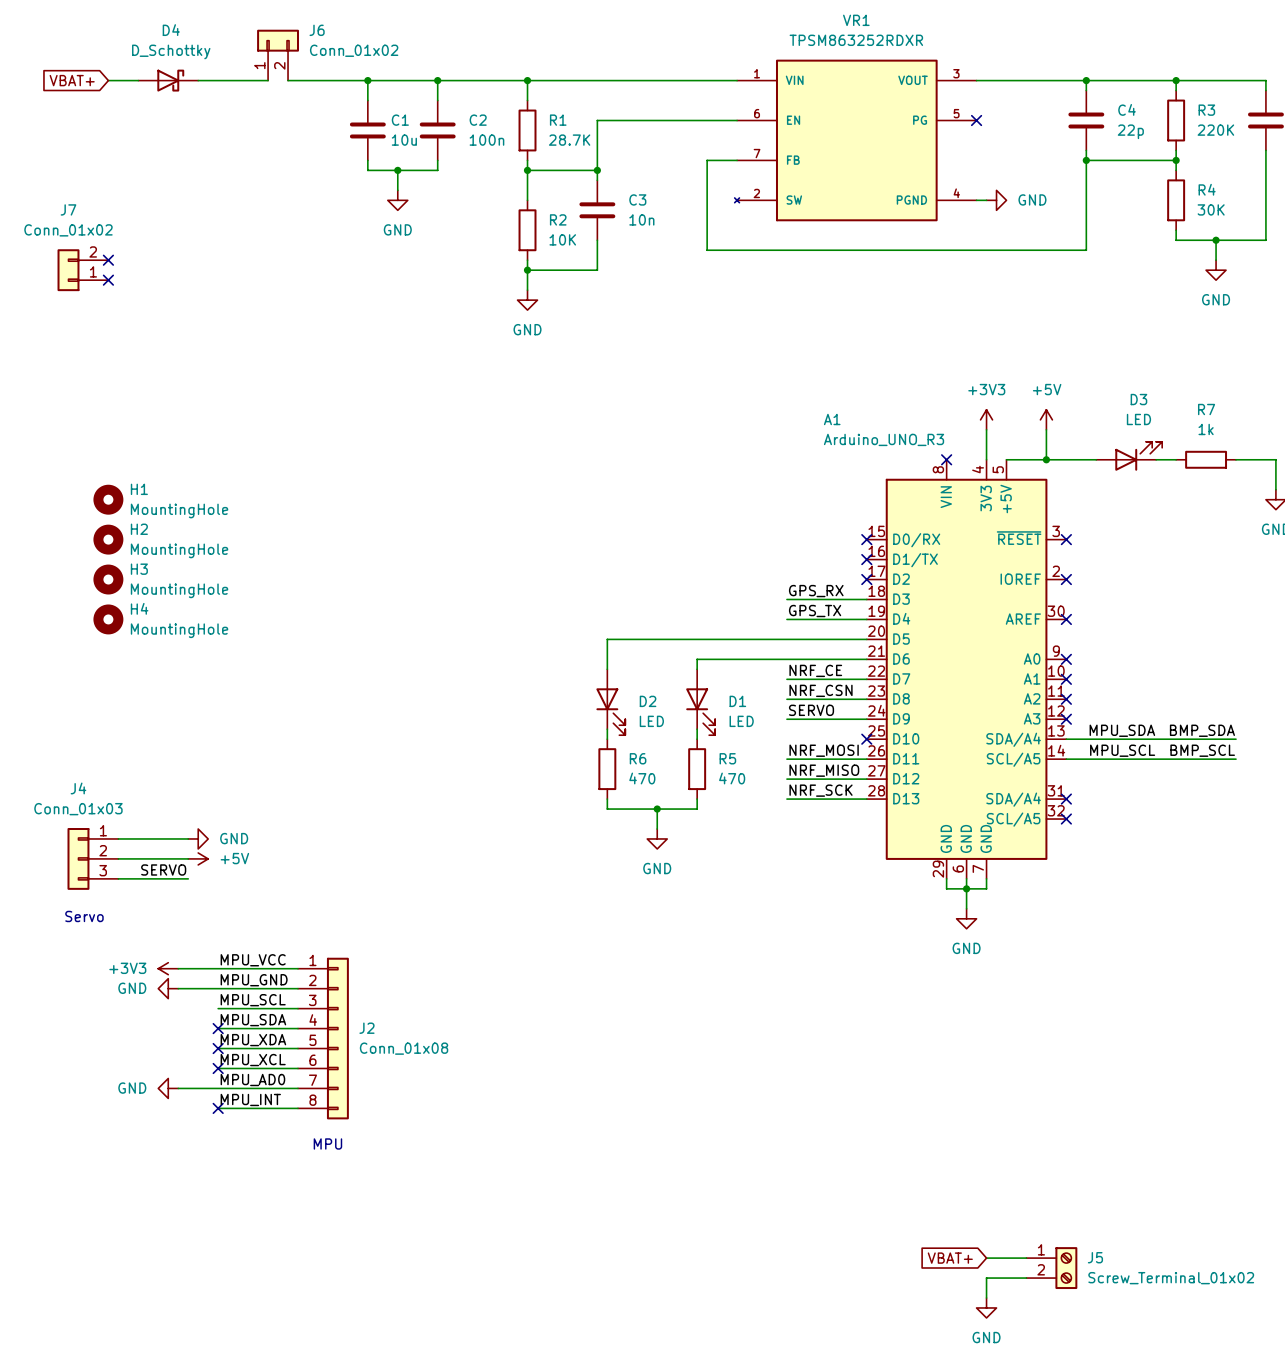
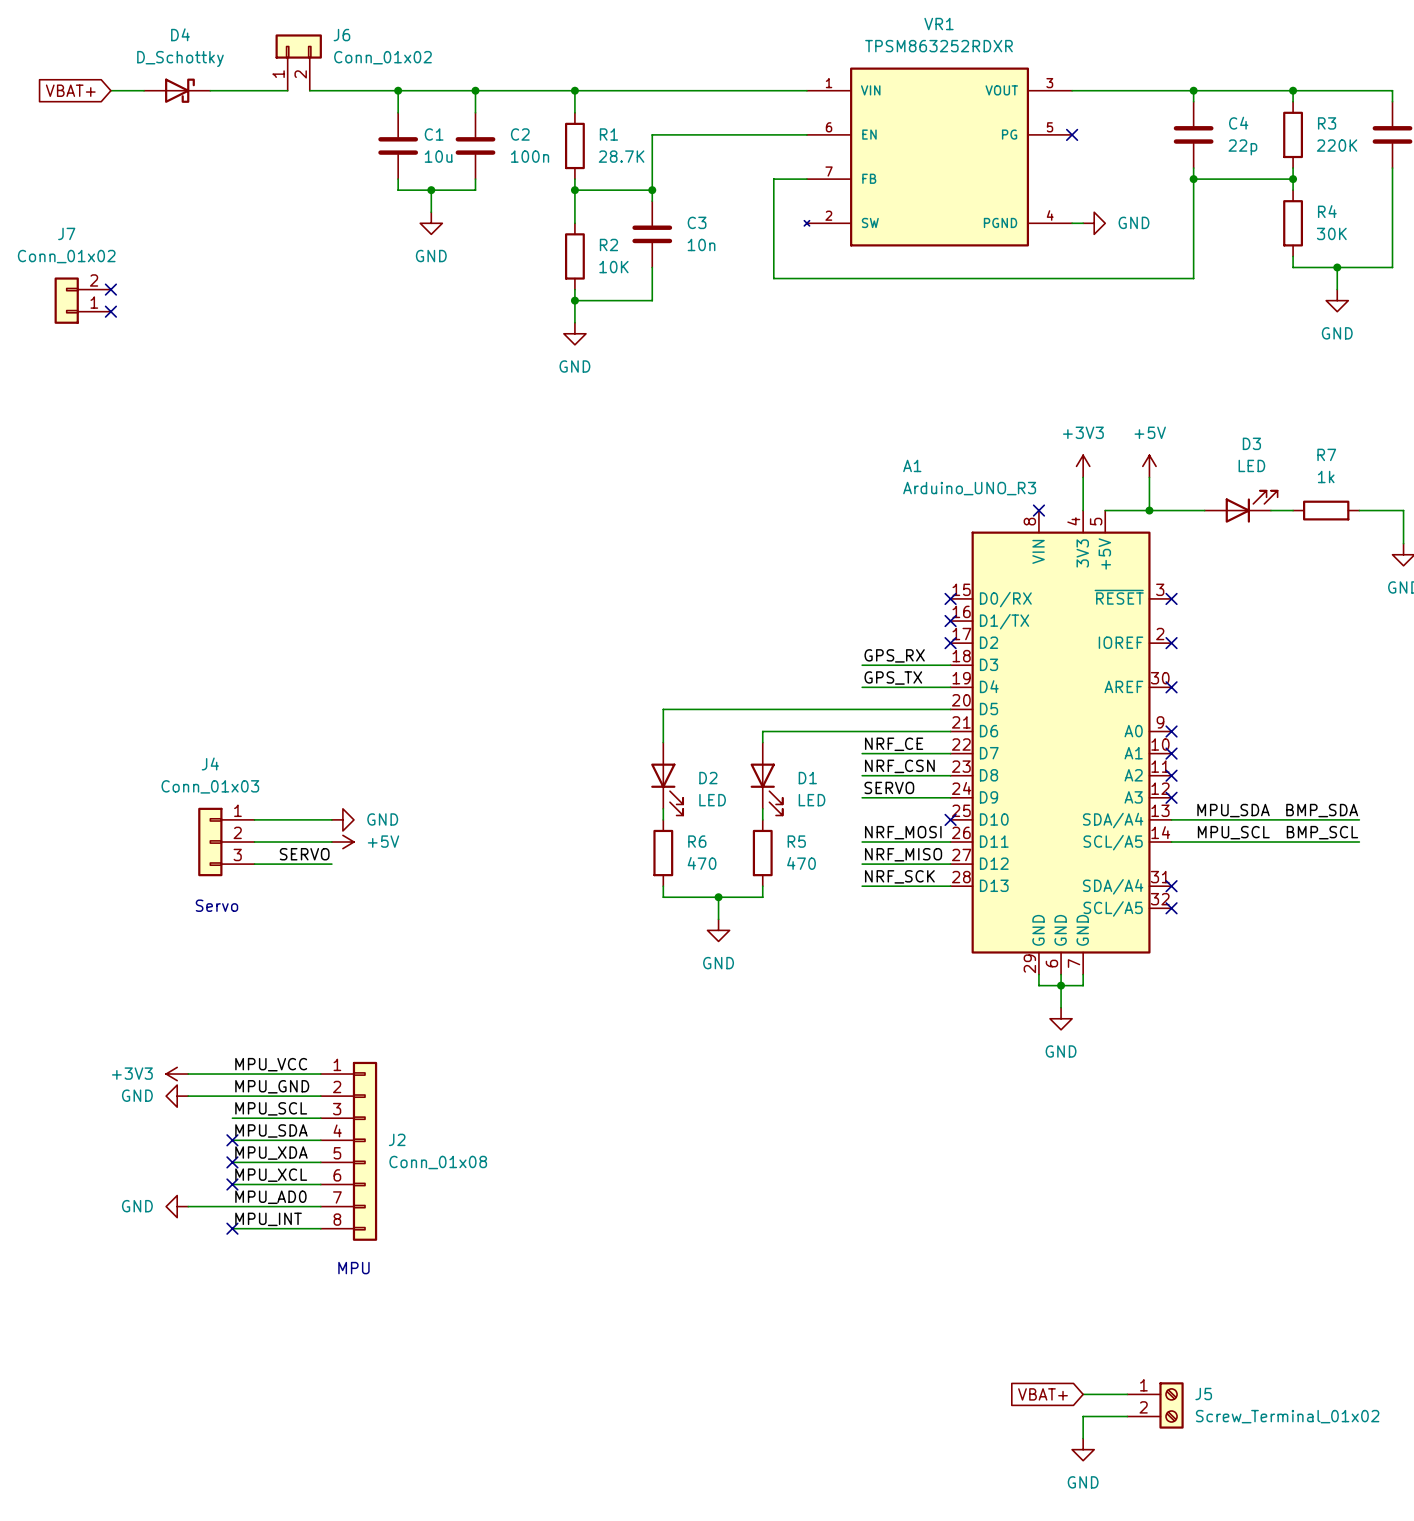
H1: MountingHole (108, 499) -> none
H2: MountingHole (108, 539) -> none
H3: MountingHole (108, 579) -> none
H4: MountingHole (108, 619) -> none
wire: (118, 838) (188, 838) -> (254, 864) (331, 864)
power symbol position: GND (198, 838) -> GND (342, 819)
J4 position: (92, 858) -> (226, 842)
wire: (118, 858) (188, 858) -> (254, 842) (331, 842)
power symbol position: +5V (198, 858) -> +5V (342, 842)
label position: SERVO (163, 869) -> SERVO (304, 854)
wire: (118, 878) (188, 878) -> (254, 819) (331, 819)
text position: Servo (84, 916) -> Servo (216, 905)

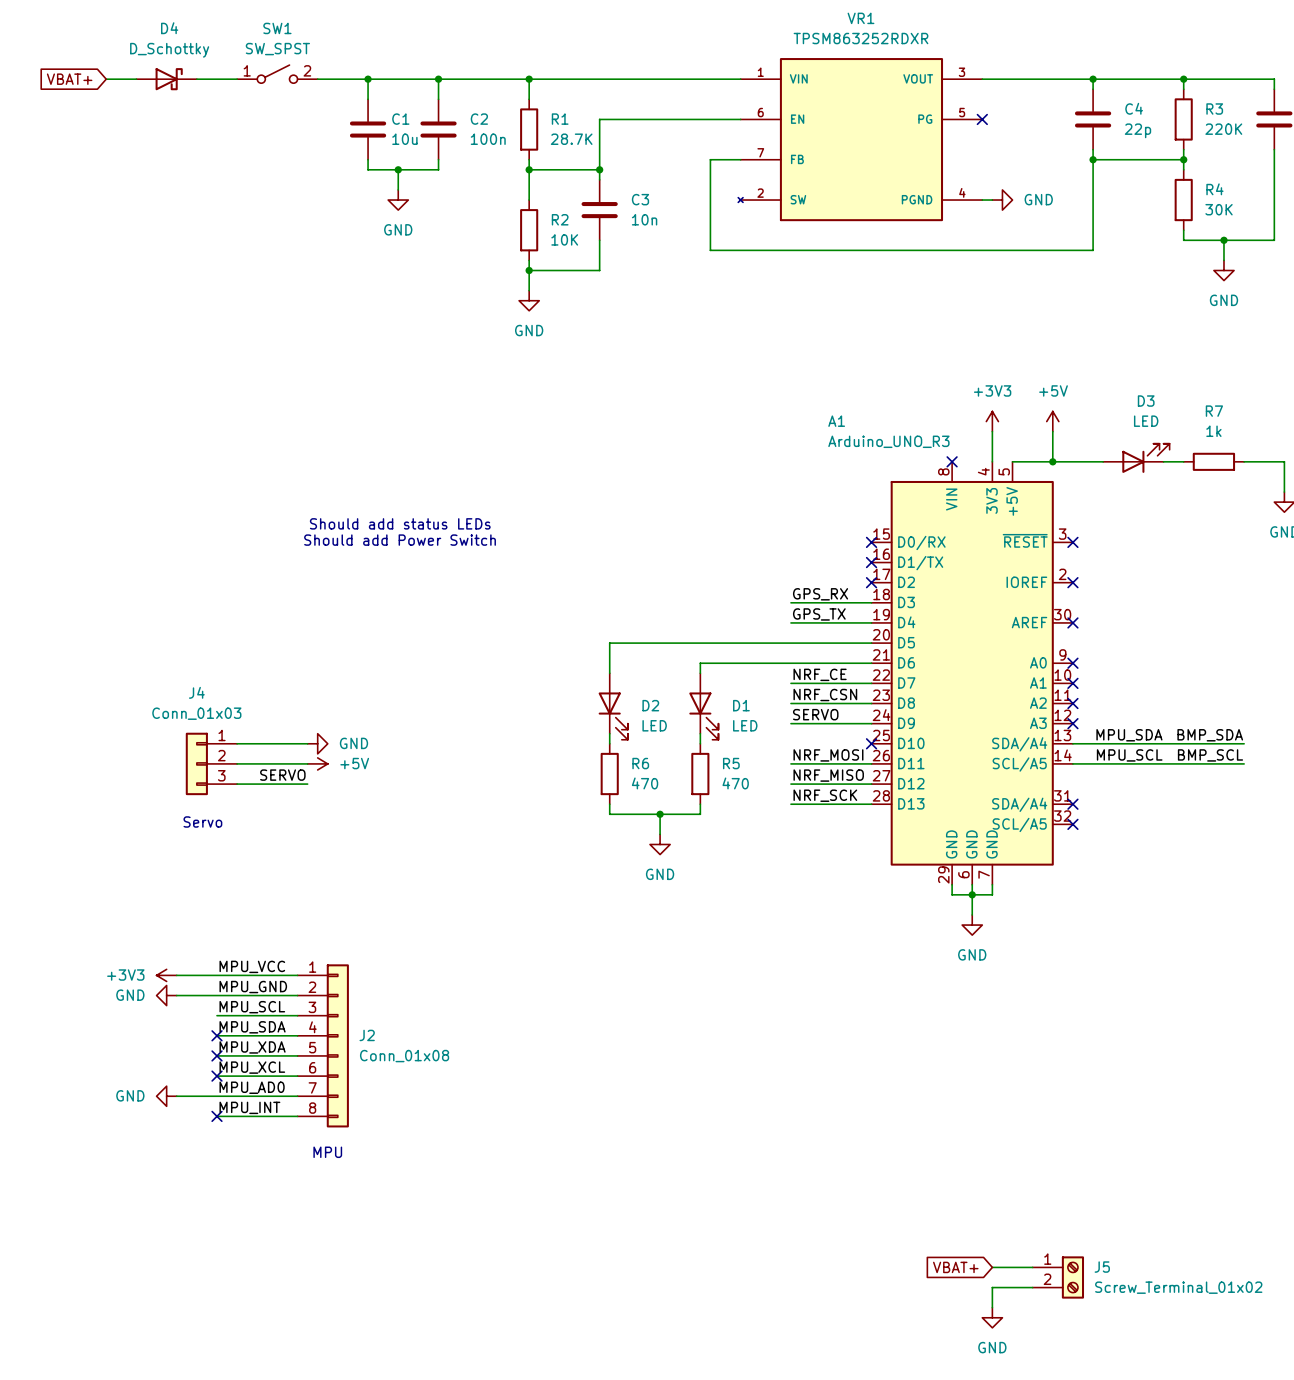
J6: Conn_01x02 (298, 62) -> none
SW1: none -> SW_SPST (277, 74)
no-connect mark: (110, 289) -> none
J7: Conn_01x02 (82, 300) -> none
no-connect mark: (110, 311) -> none
text: none -> Should add status LEDs (400, 523)
text: none -> Should add Power Switch (400, 540)

